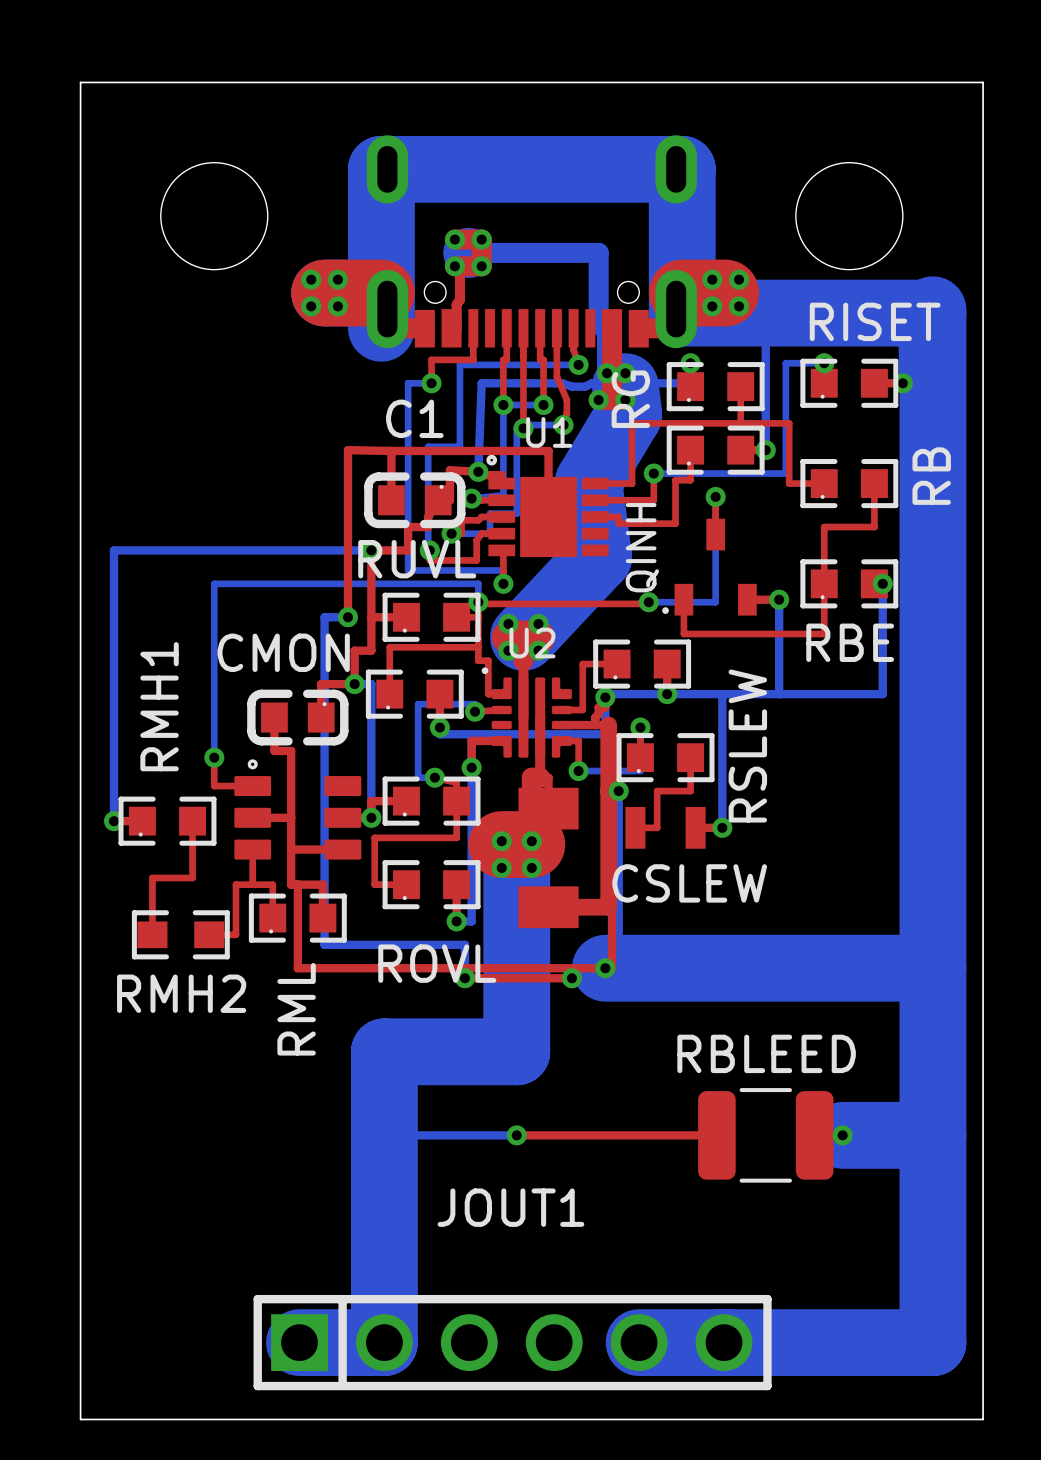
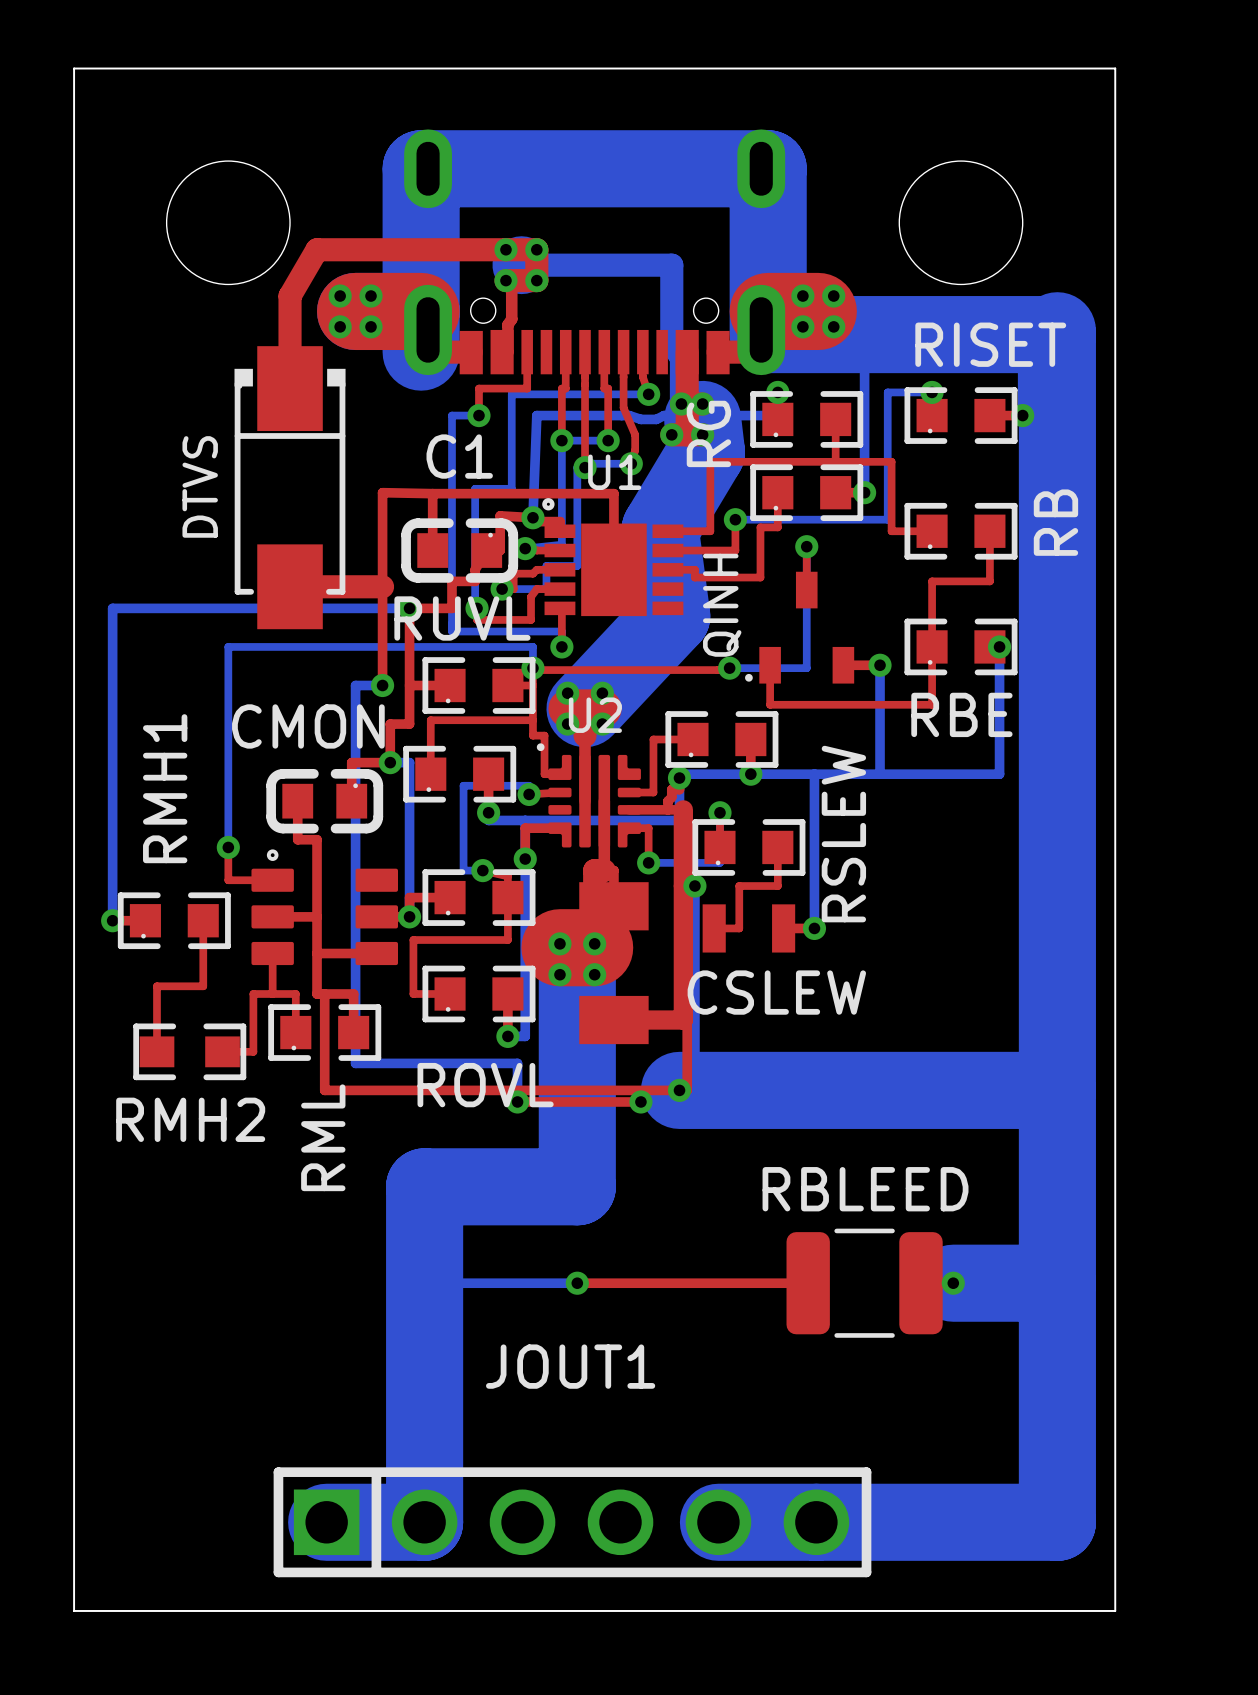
top track: none -> (505, 249) (317, 249) (290, 296) (290, 388)
DTVS: none -> (290, 487)
top track: none -> (290, 586) (382, 586)

